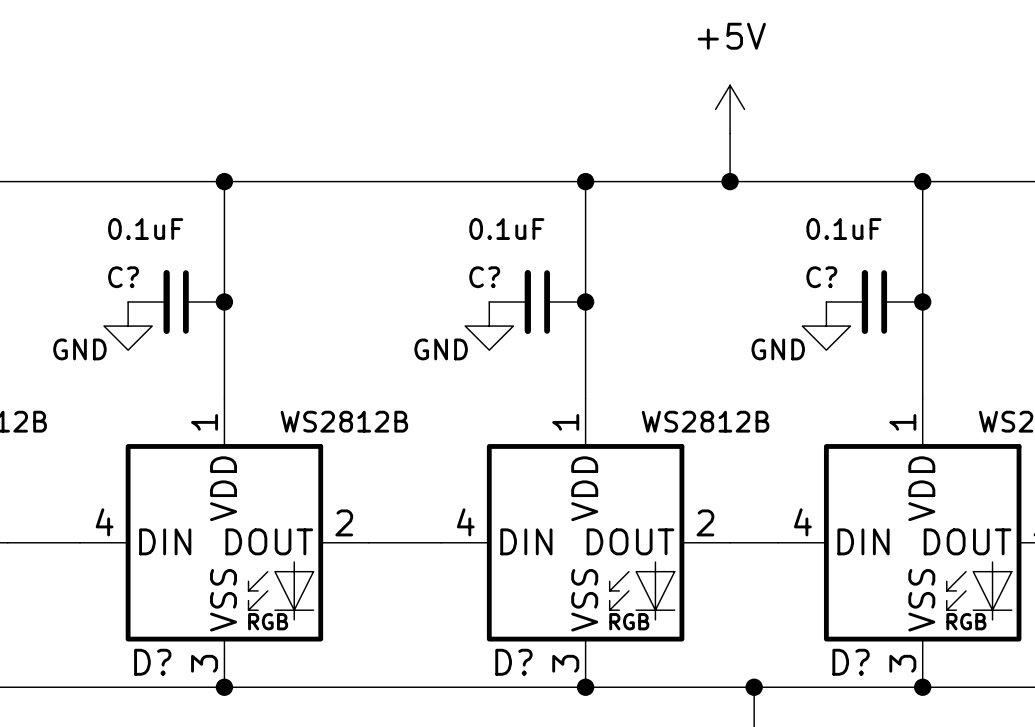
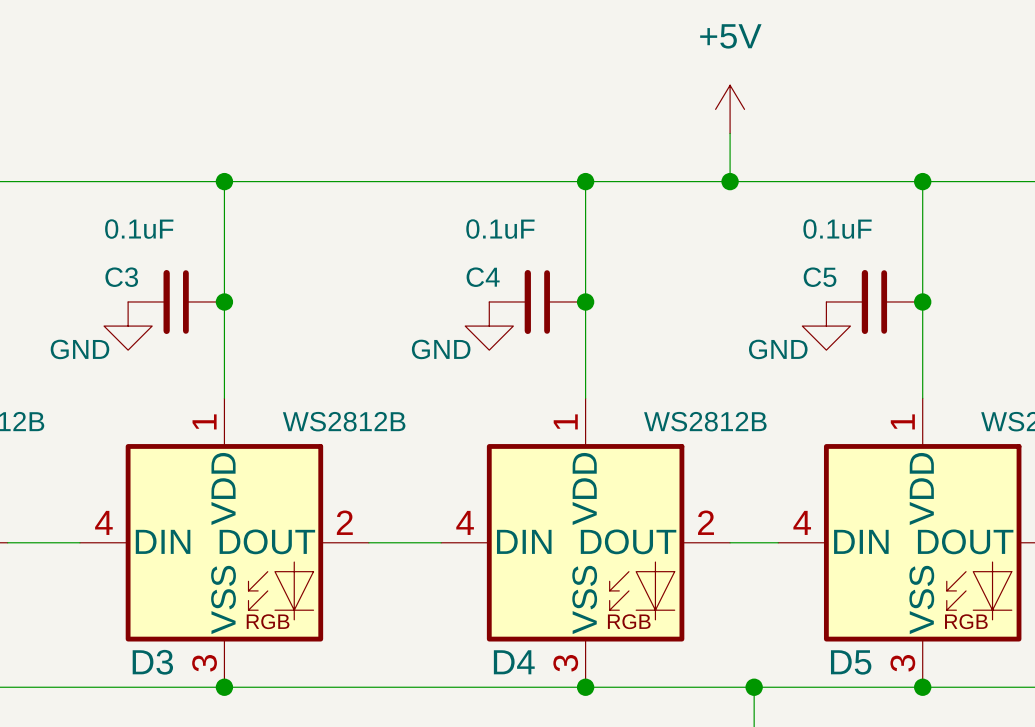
C? name: C? (123, 277) -> C3 (121, 277)
C? name: C? (484, 277) -> C4 (483, 277)
C? name: C? (821, 277) -> C5 (820, 277)
D? name: D? (152, 662) -> D3 (152, 662)
D? name: D? (513, 662) -> D4 (514, 662)
D? name: D? (851, 662) -> D5 (851, 662)

